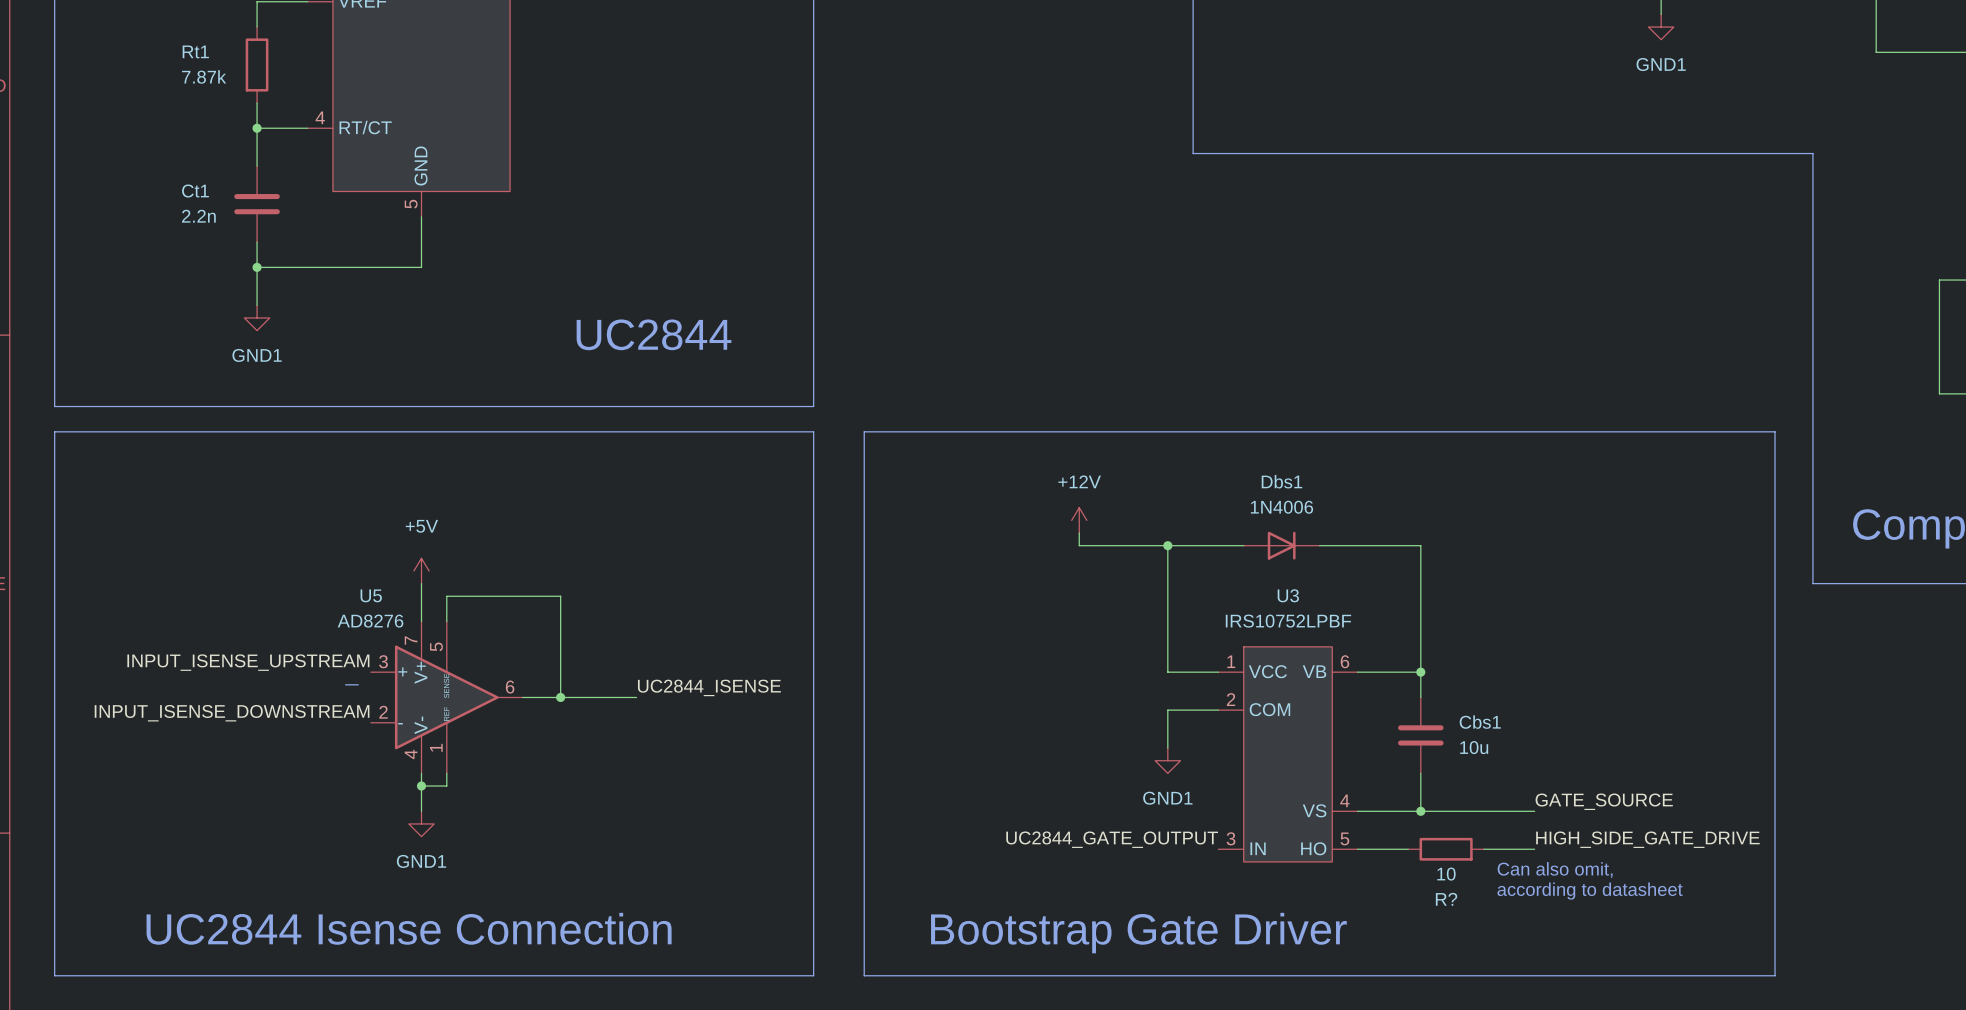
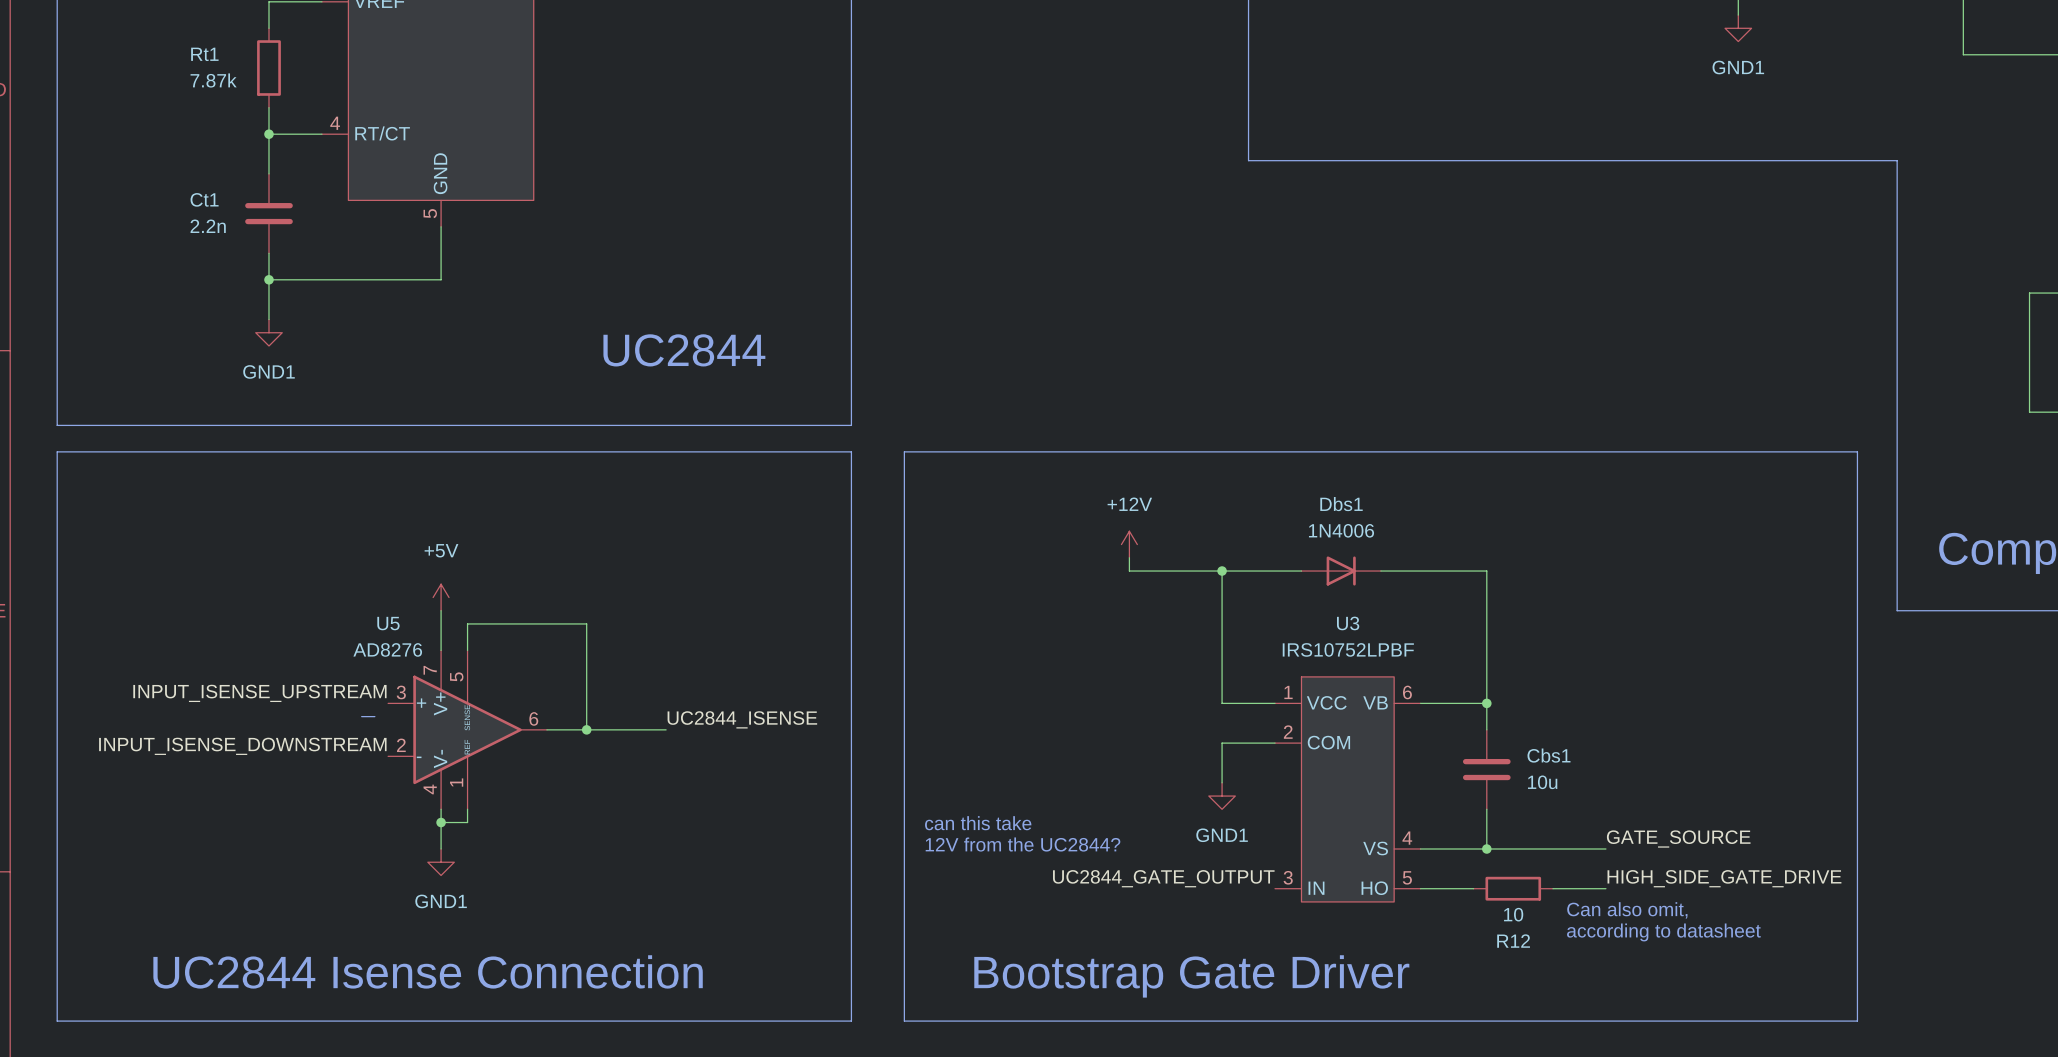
text: none -> can this take (978, 823)
text: none -> 12V from the UC2844? (1023, 844)
R? name: R? (1446, 899) -> R12 (1513, 941)

